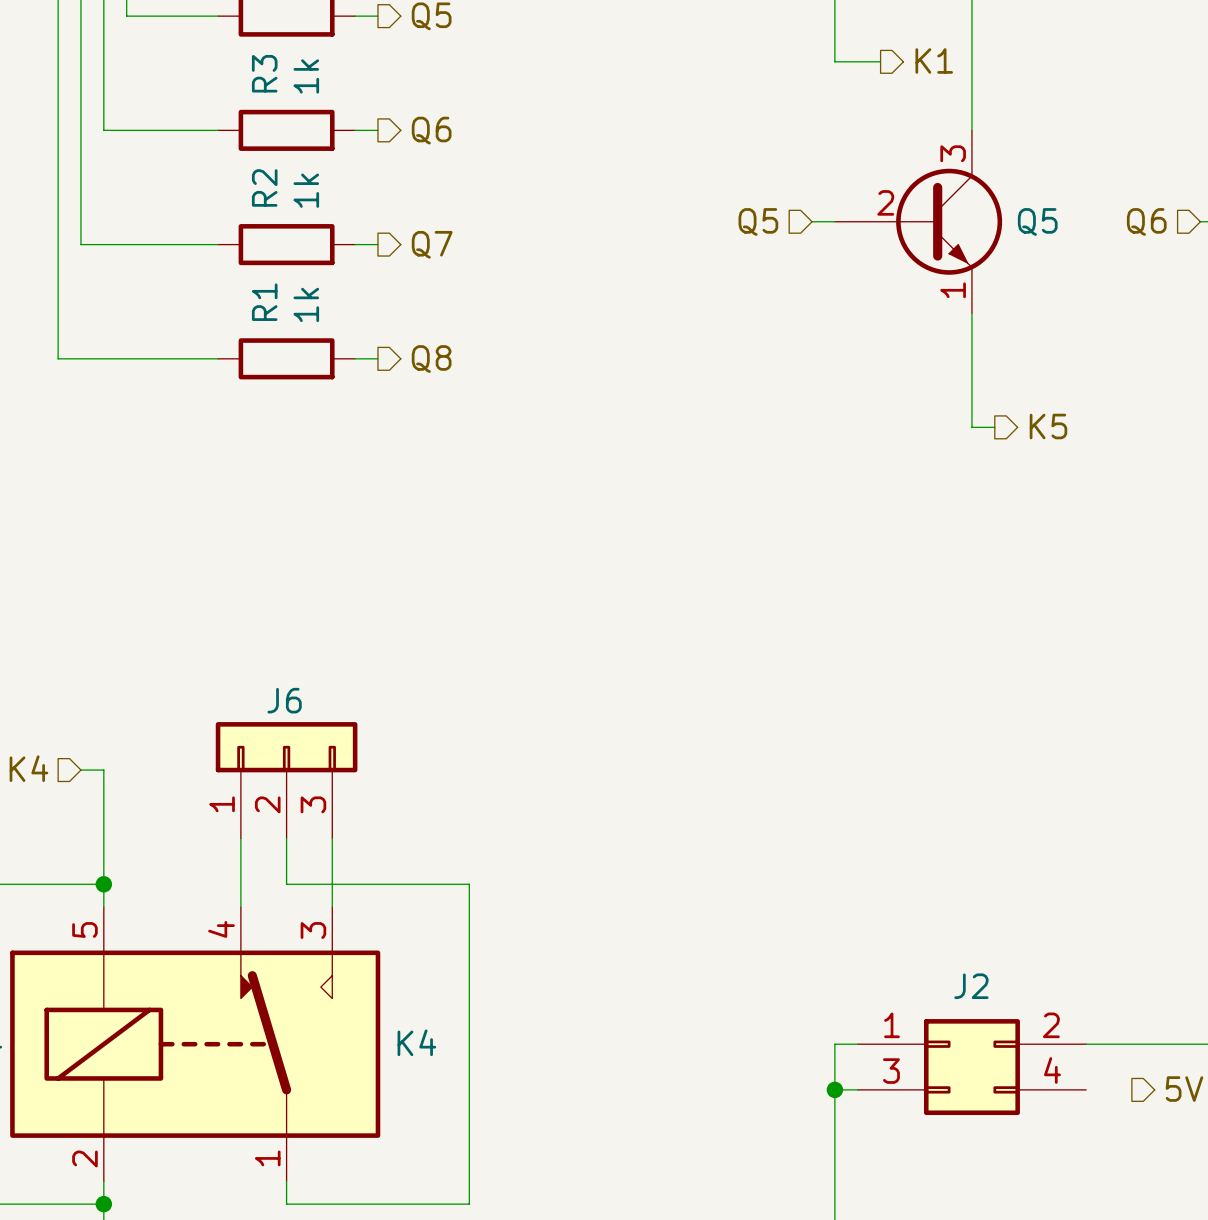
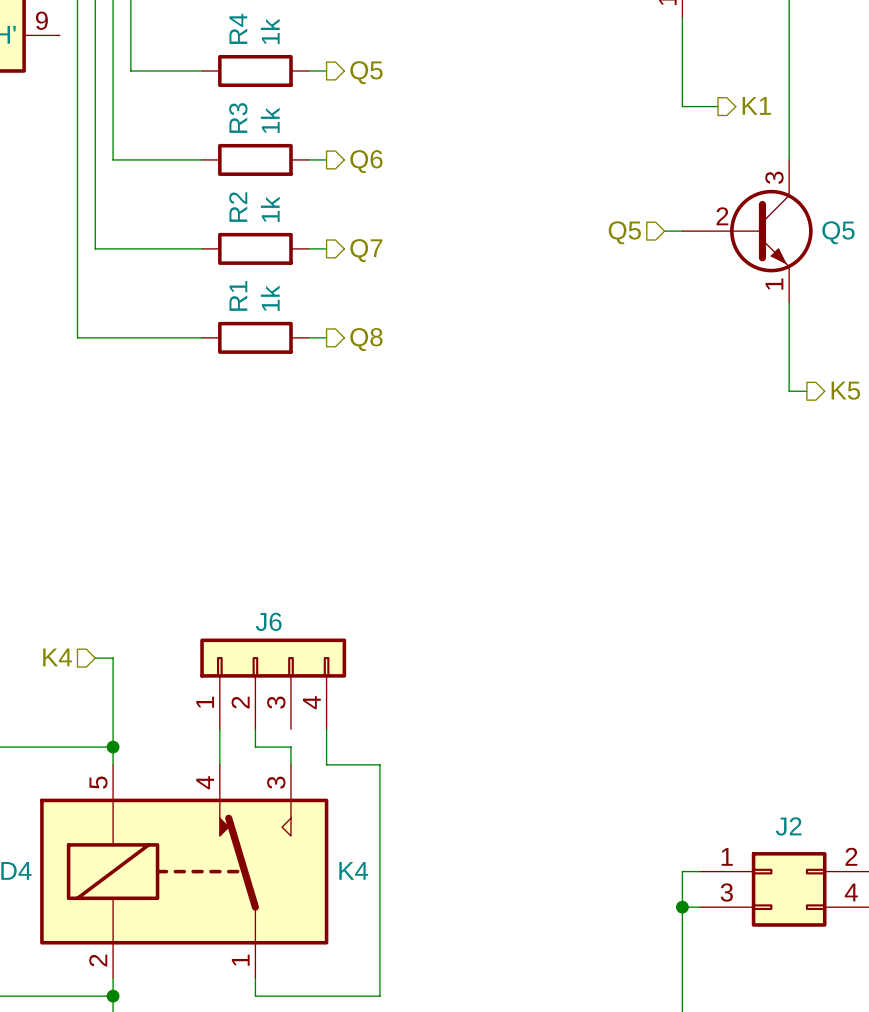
J6 symbol: [215, 722, 358, 839] -> [200, 638, 347, 730]
wire: (332, 838) (332, 884) (469, 884) (469, 1204) (446, 1204) -> (326, 729) (326, 764) (379, 764) (379, 996)

